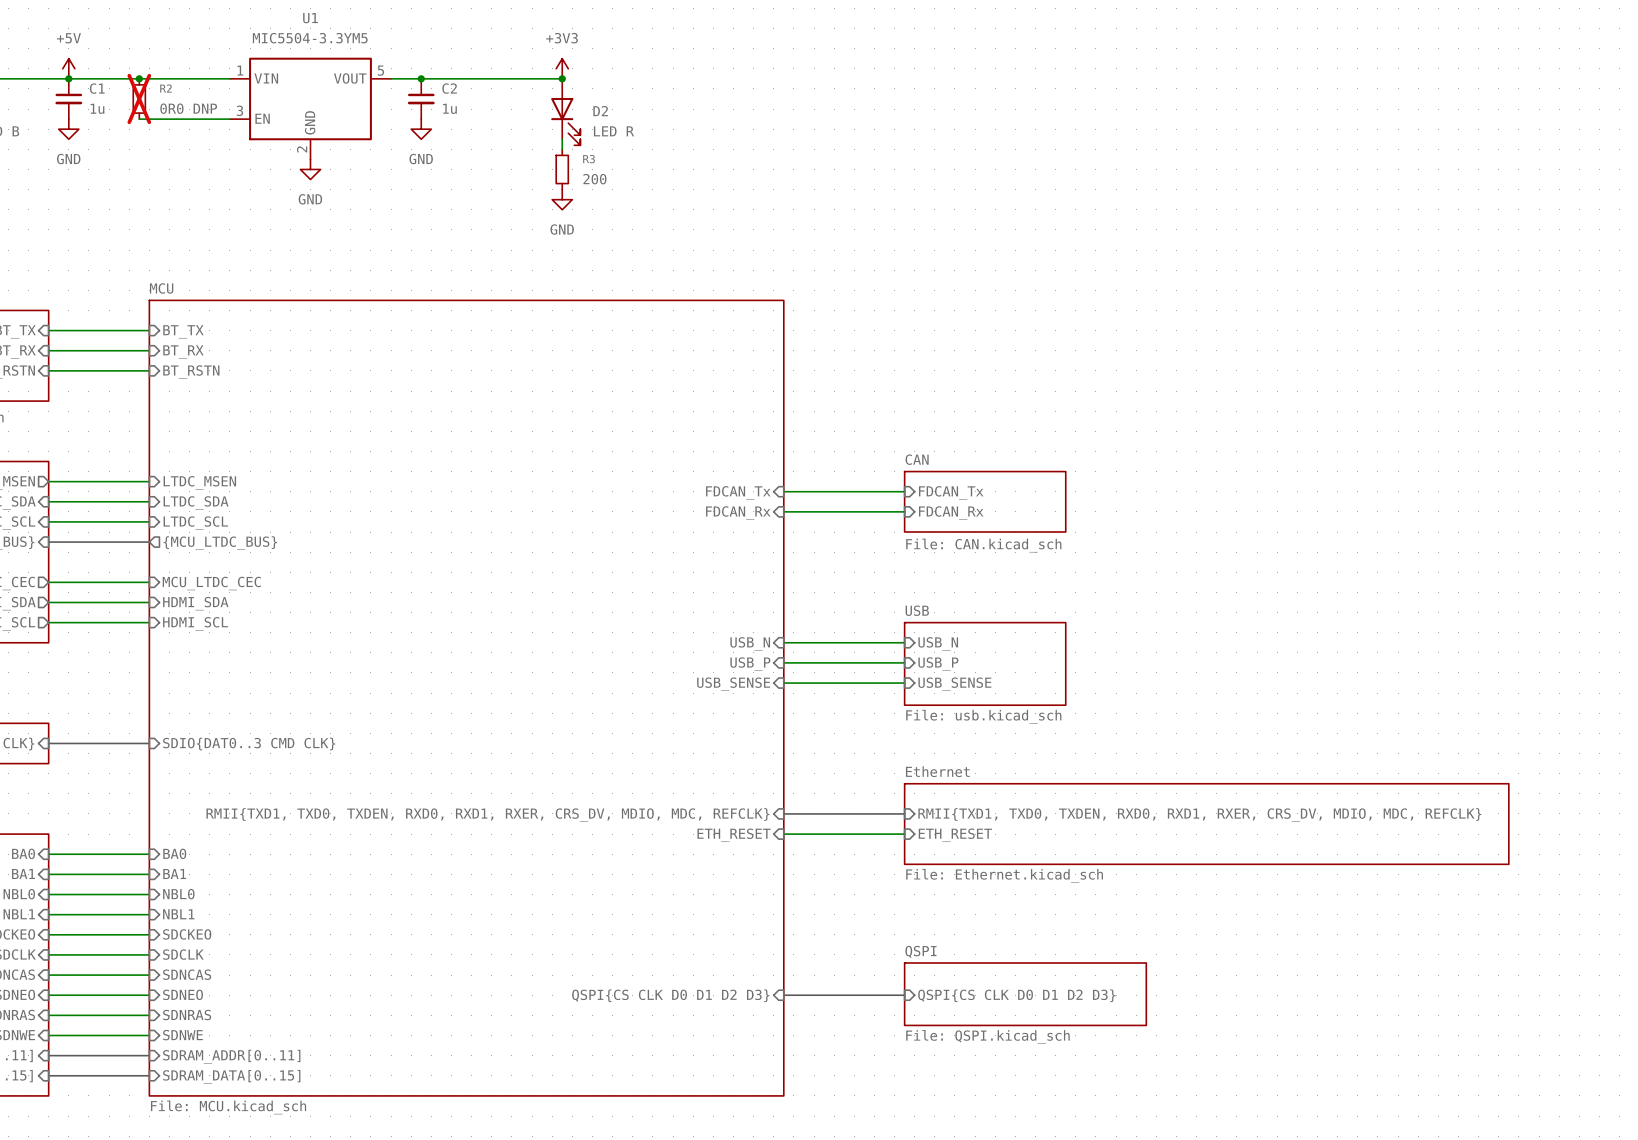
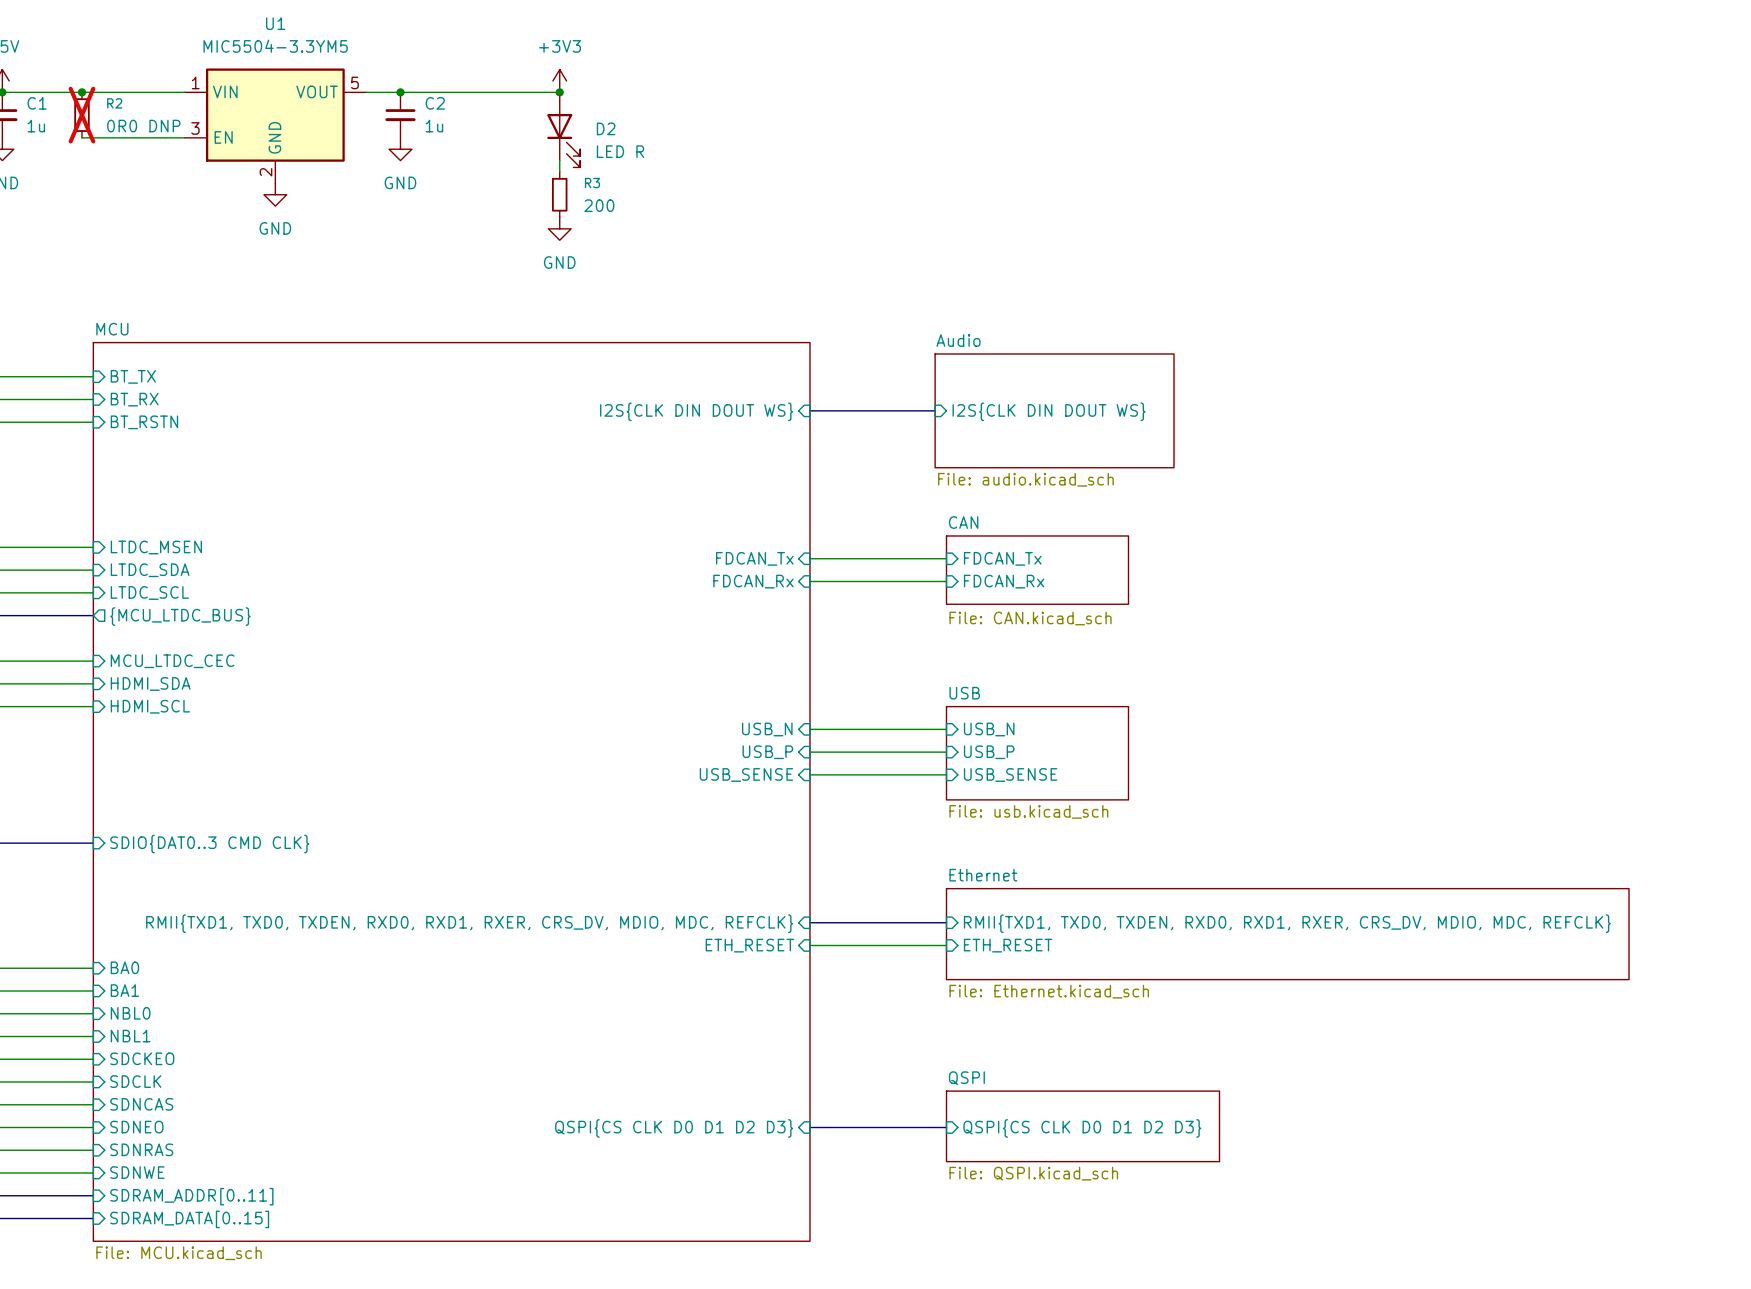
bus: none -> (809, 410) (935, 410)
sheet Audio: none -> File: audio.kicad_sch (1054, 410)
sheet pin: none -> I2S{CLK DIN DOUT WS} (696, 411)
sheet pin: none -> I2S{CLK DIN DOUT WS} (1049, 411)

